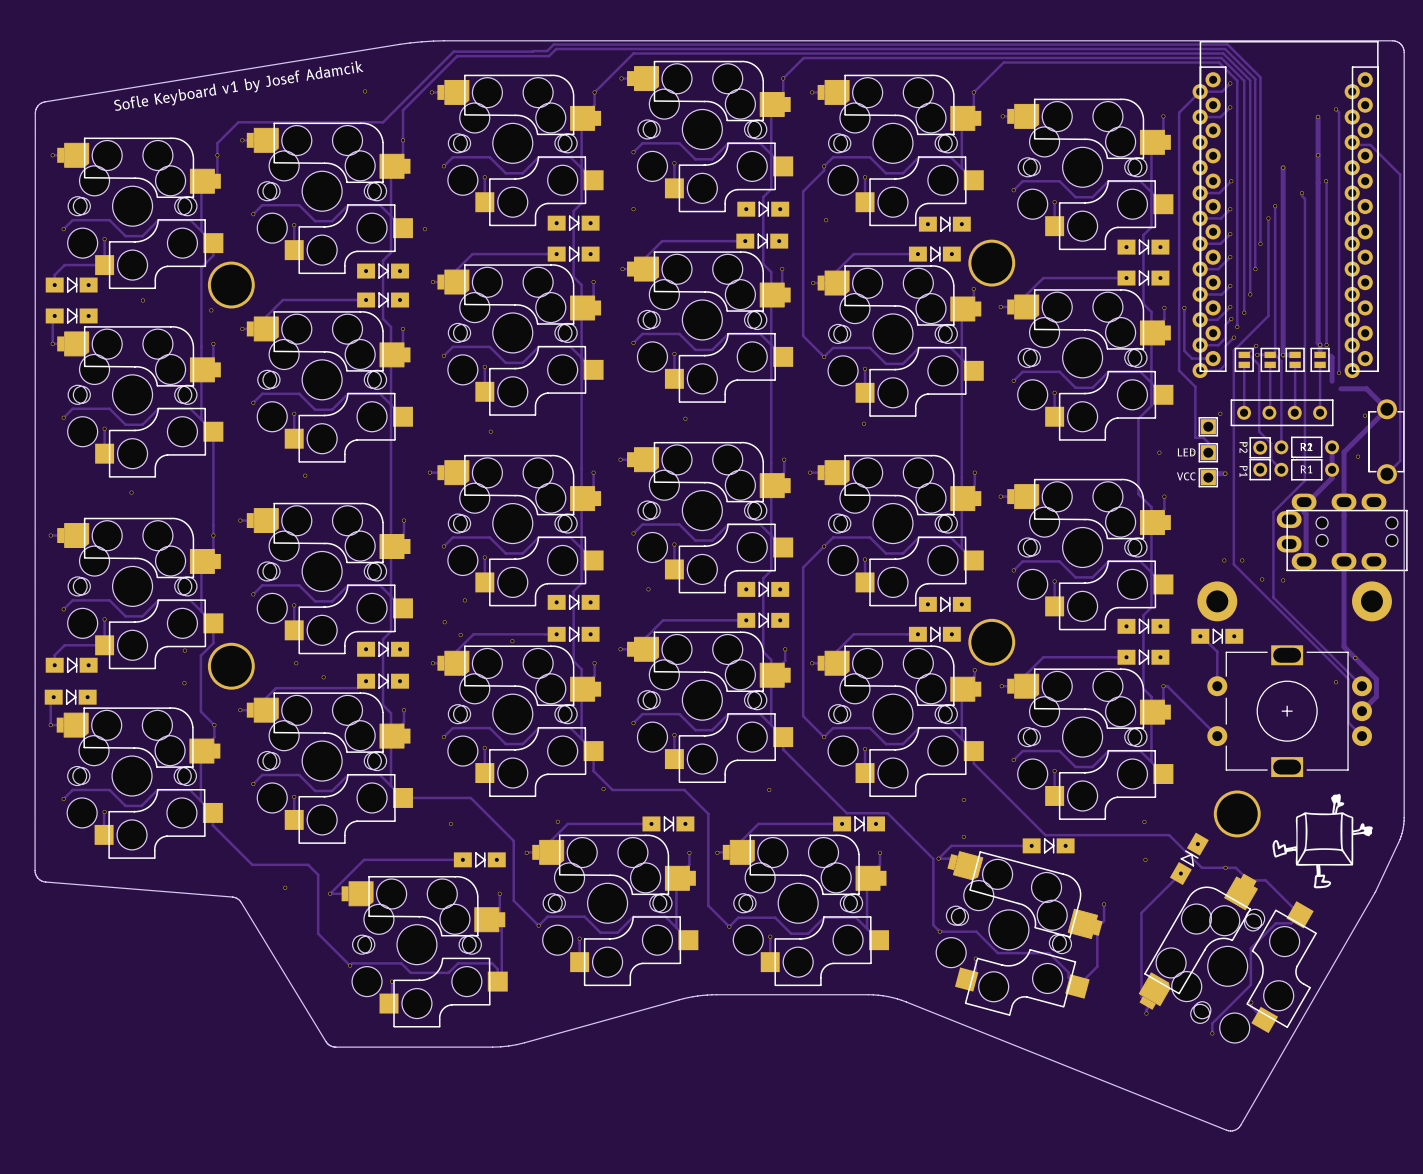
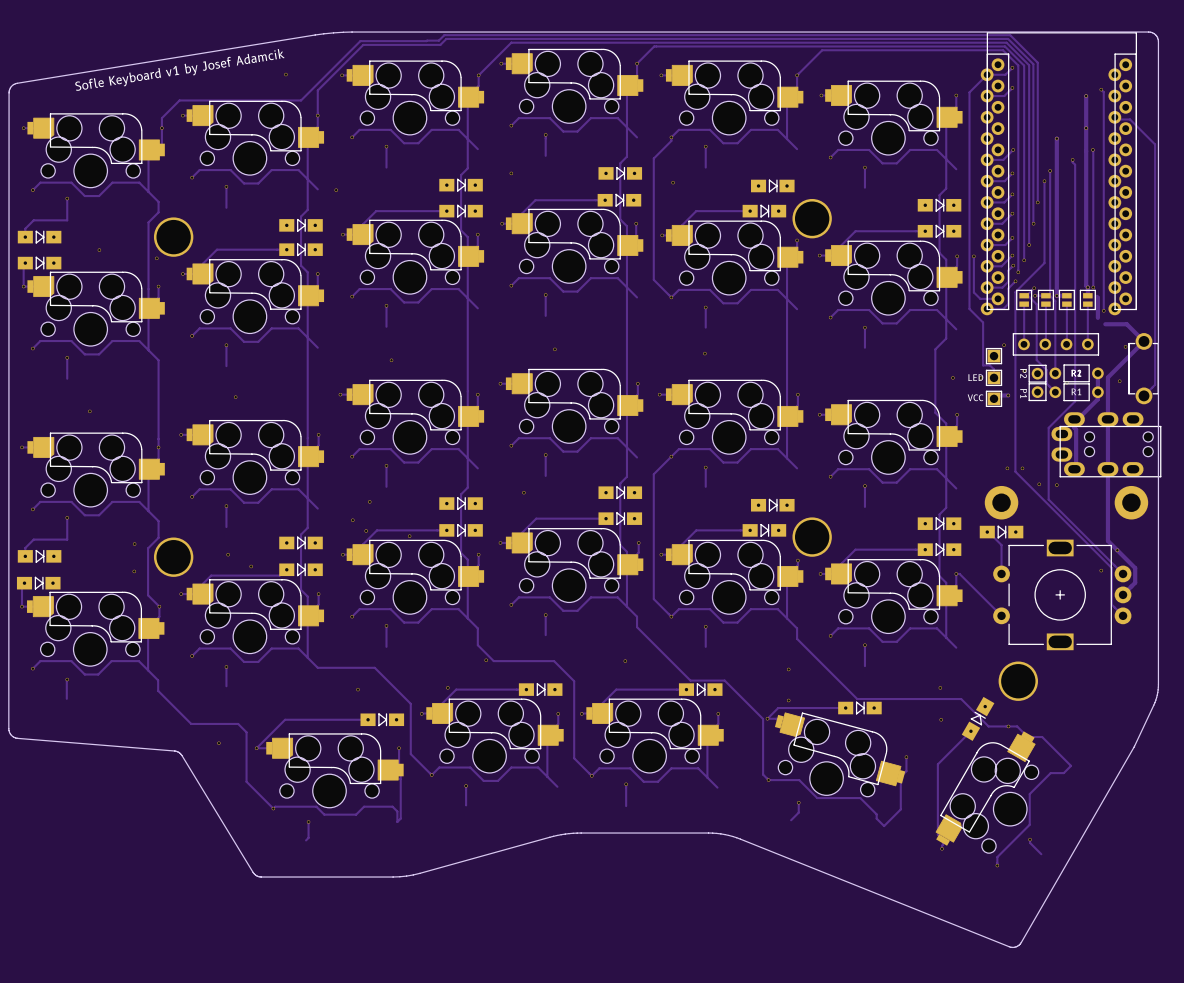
part: none -> (574, 86)
part: none -> (415, 97)
part: none -> (734, 97)
part: (710, 136) -> none
part: none -> (893, 117)
part: (520, 150) -> none
part: (900, 150) -> none
part: none -> (255, 137)
part: (1090, 174) -> none
part: none -> (96, 150)
part: (329, 198) -> none
part: (140, 213) -> none
part: none -> (574, 245)
part: none -> (415, 256)
part: none -> (734, 257)
part: (710, 327) -> none
part: none -> (893, 277)
part: (520, 339) -> none
part: (900, 340) -> none
part: none -> (255, 296)
part: (1090, 364) -> none
part: none -> (96, 308)
part: (329, 386) -> none
part: (140, 401) -> none
part: none -> (574, 406)
part: none -> (415, 416)
part: none -> (734, 416)
part: (710, 517) -> none
part: none -> (893, 437)
part: (520, 530) -> none
part: (900, 530) -> none
part: none -> (255, 457)
part: (1090, 554) -> none
part: none -> (96, 469)
part: (329, 578) -> none
part: (140, 593) -> none
part: none -> (574, 565)
part: none -> (415, 576)
part: none -> (734, 576)
part: (710, 707) -> none
part: none -> (893, 596)
part: (520, 721) -> none
part: (900, 721) -> none
part: none -> (255, 616)
part: (1090, 744) -> none
part: none -> (95, 628)
part: (329, 768) -> none
part: (139, 783) -> none
drawing: [1272, 793, 1373, 889] -> none
part: none -> (495, 735)
part: none -> (655, 735)
part: none -> (840, 754)
part: (615, 910) -> none
part: (805, 910) -> none
part: none -> (334, 770)
part: (1019, 933) -> none
part: none -> (987, 792)
part: (424, 951) -> none
part: (1227, 958) -> none

